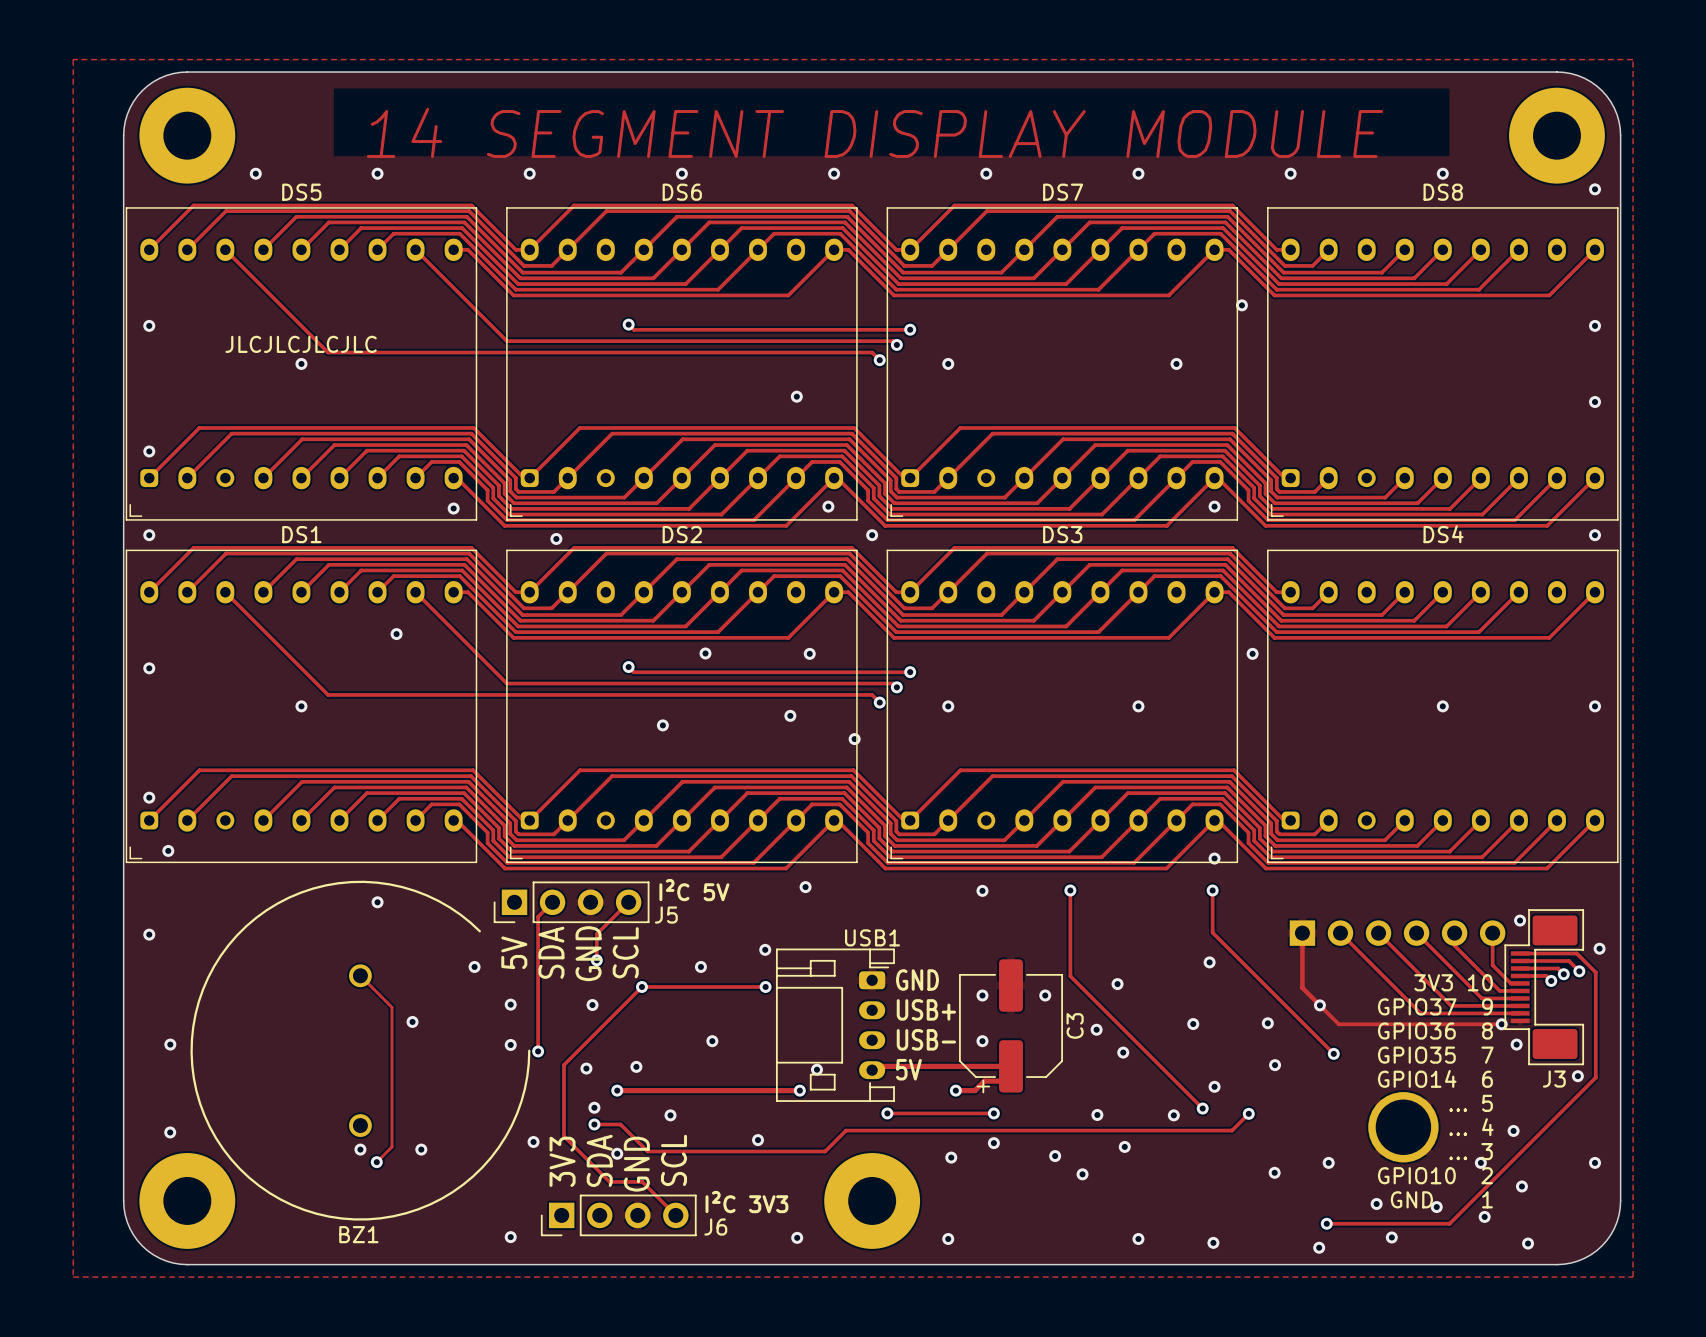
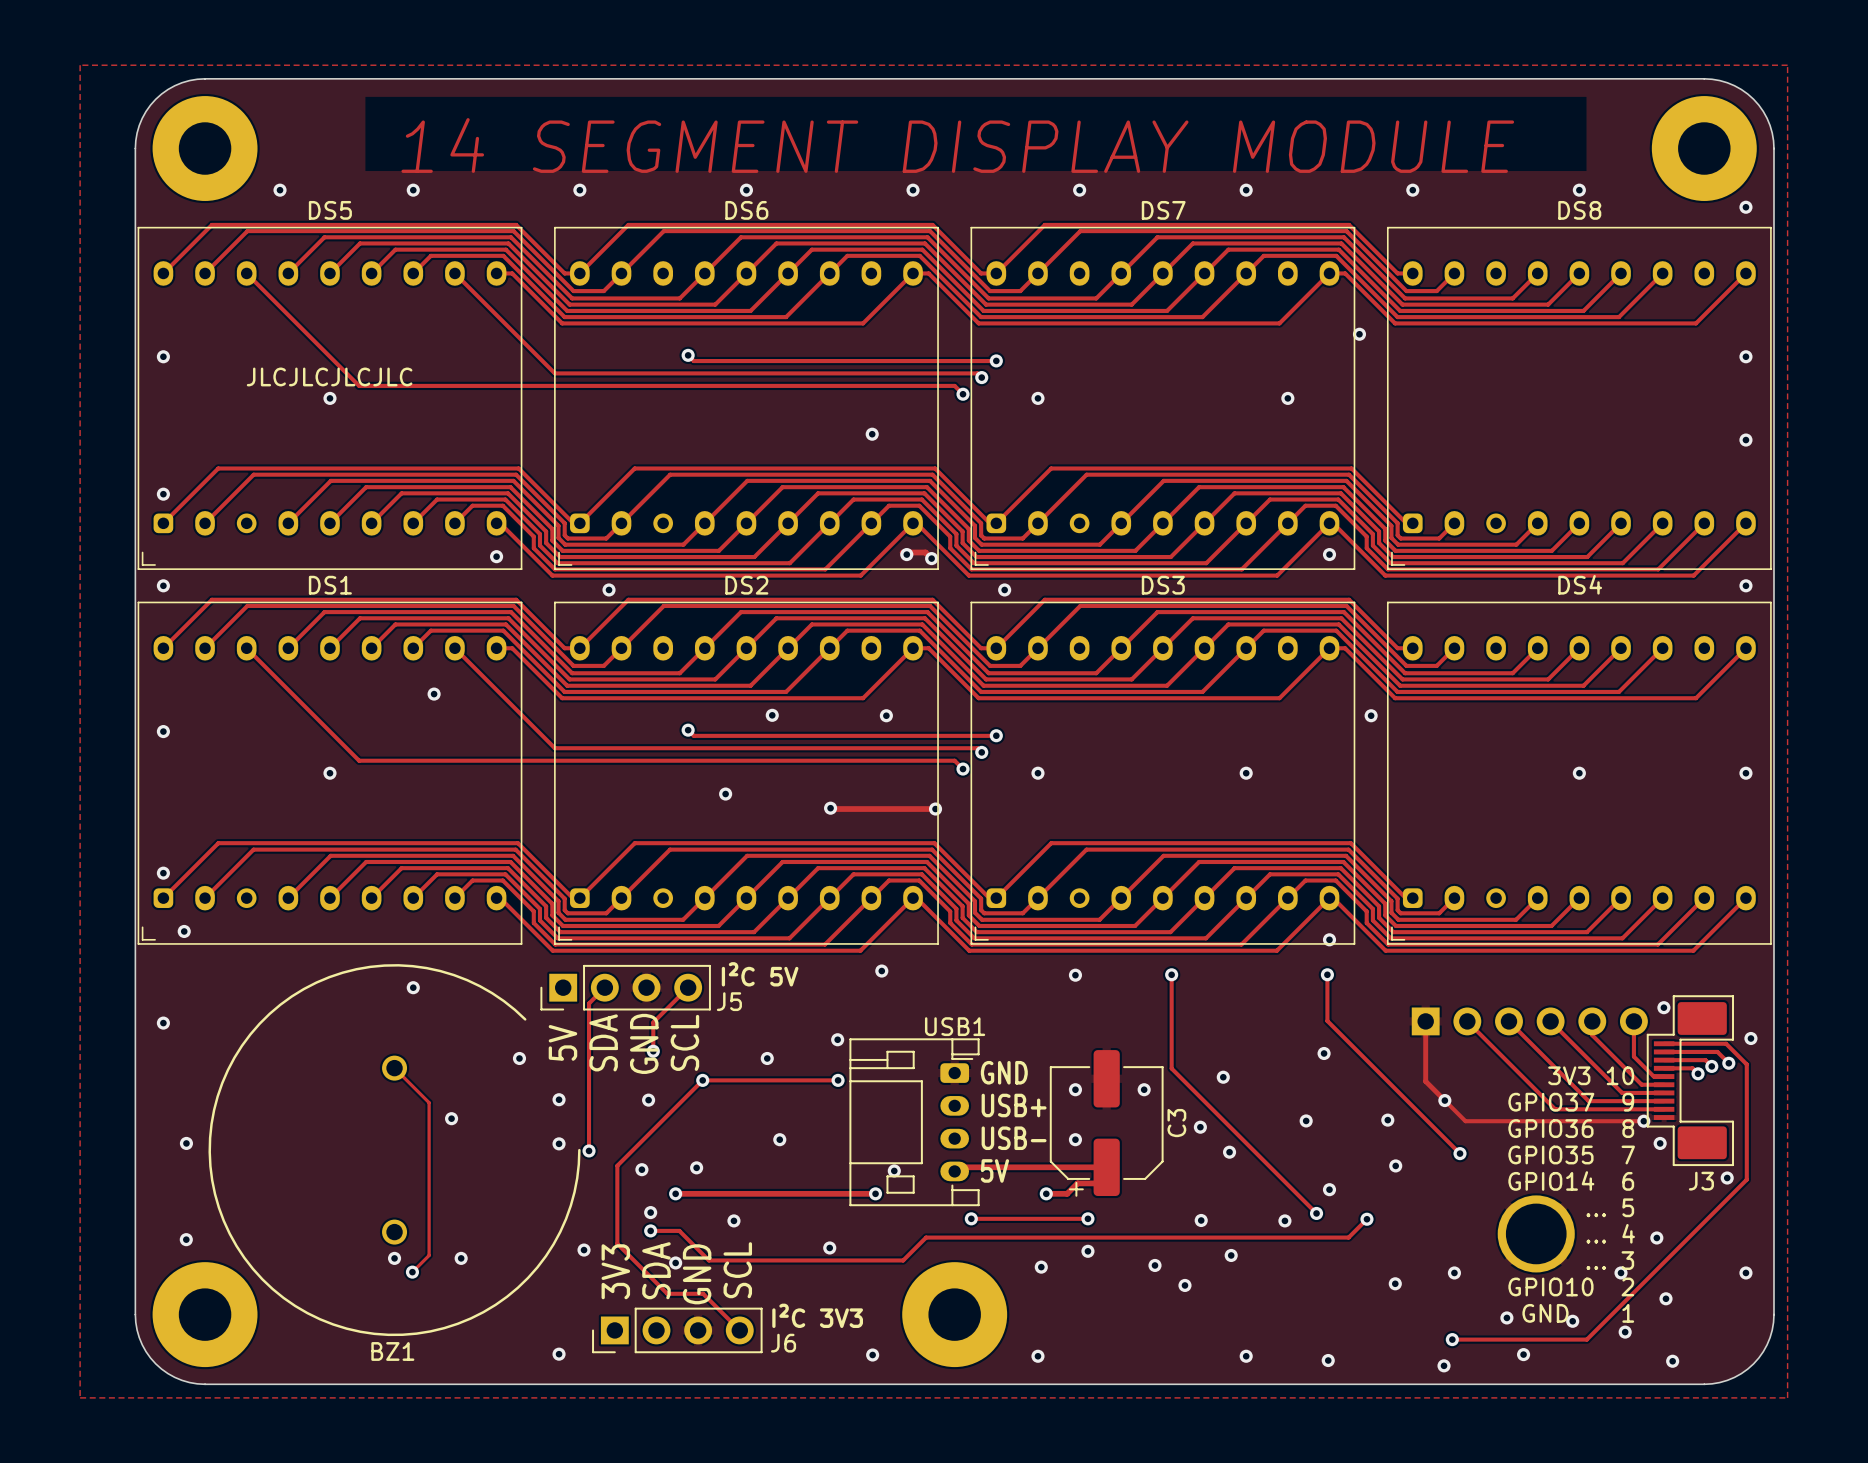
track: none -> (902, 552) (925, 552) (931, 558)
via: none -> (931, 558)
via: (872, 535) -> none
via: none -> (1004, 589)
via position: (790, 715) -> (830, 808)
track: none -> (830, 808) (935, 809)

